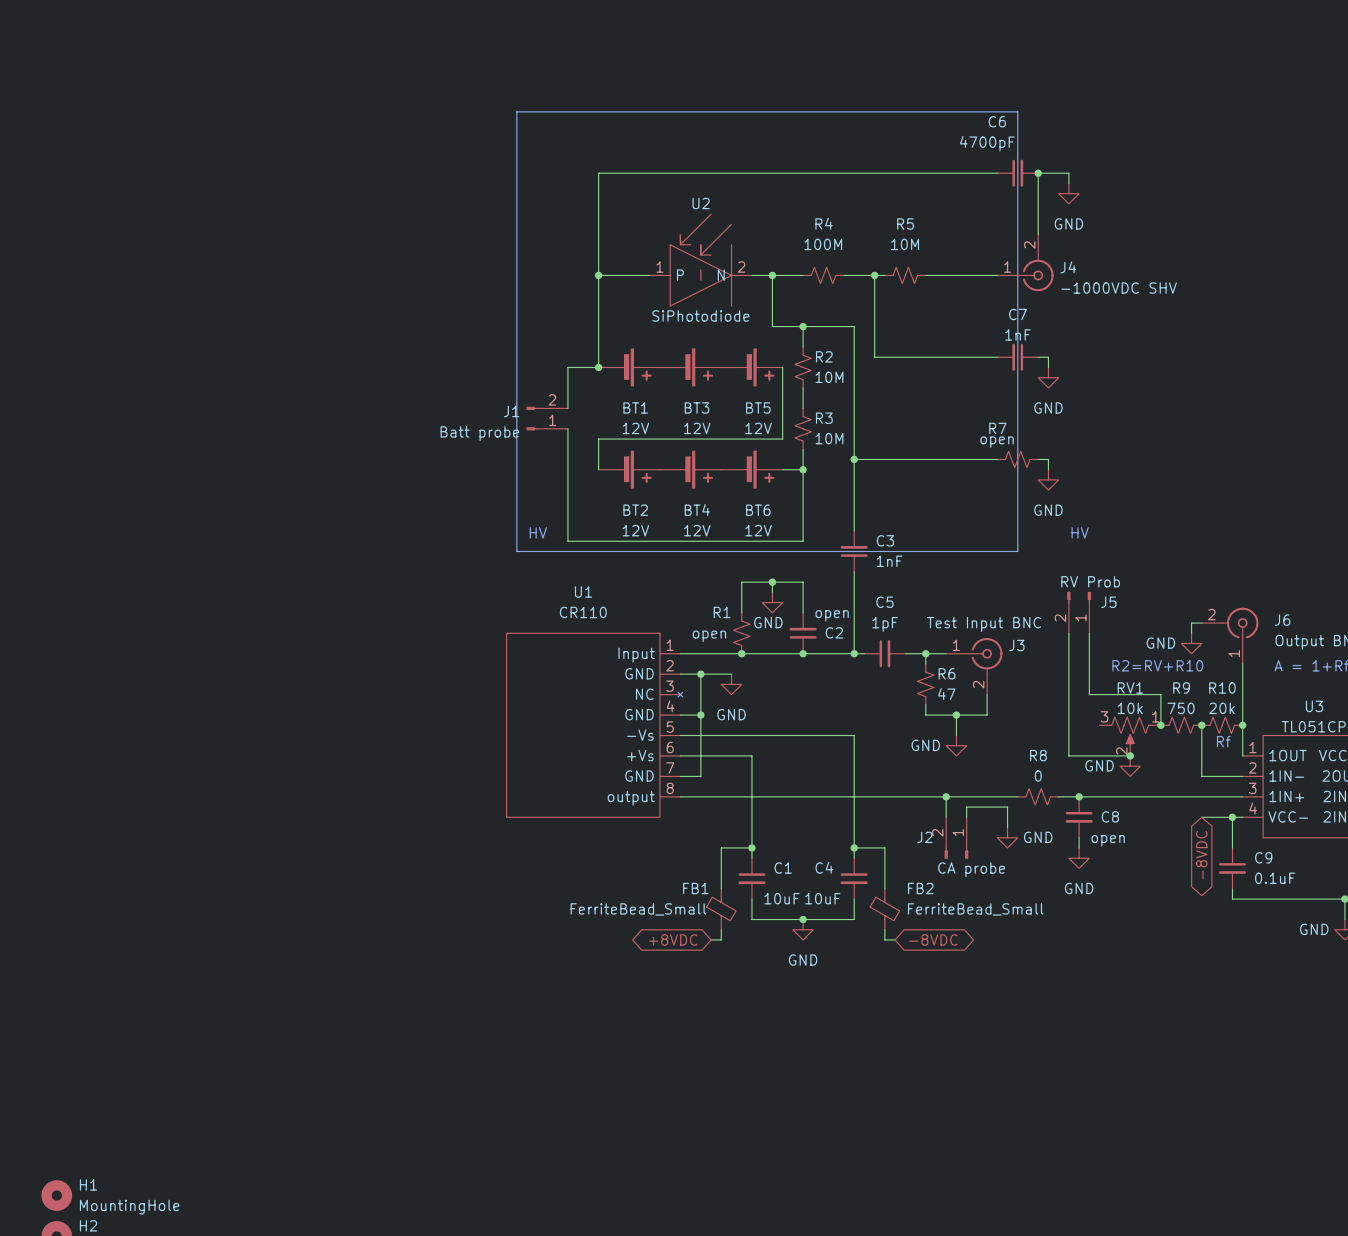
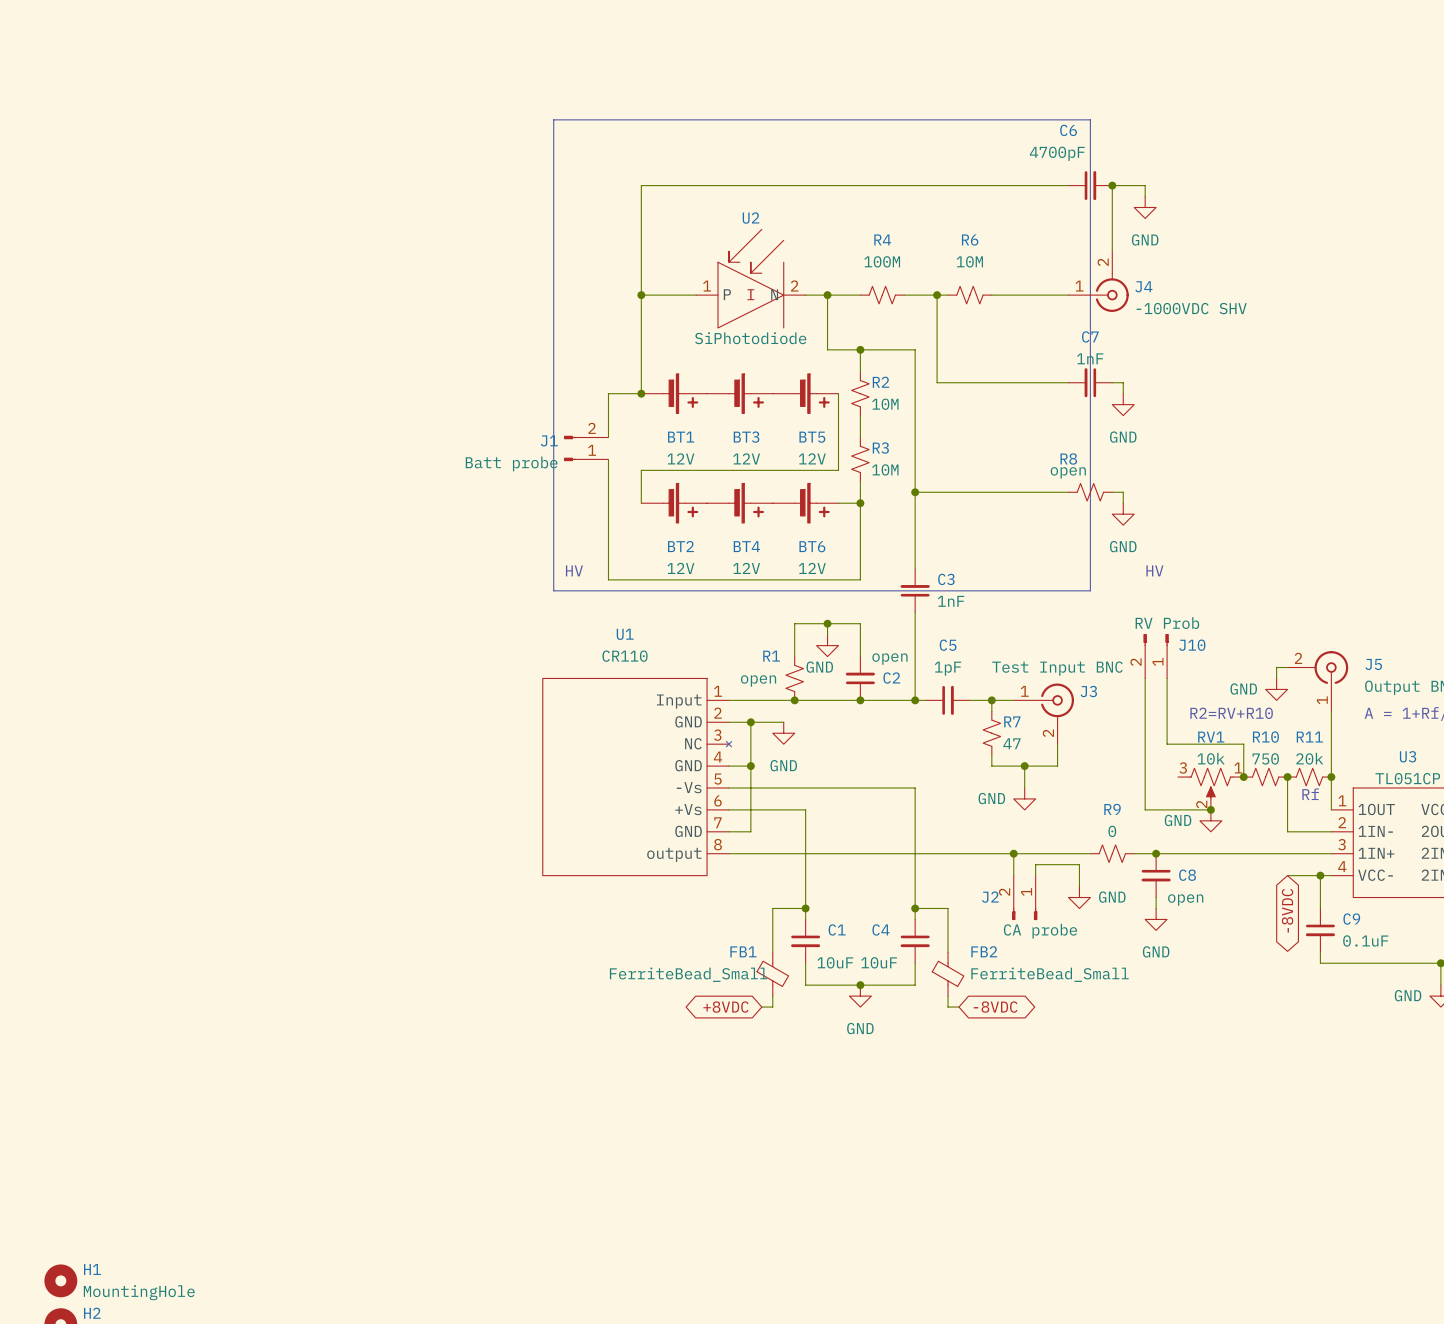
R5 name: R5 (905, 223) -> R6 (970, 240)
R7 name: R7 (997, 428) -> R8 (1068, 459)
J5 name: J5 (1108, 602) -> J10 (1192, 645)
J6 name: J6 (1282, 620) -> J5 (1373, 664)
R6 name: R6 (947, 673) -> R7 (1012, 721)
R9 name: R9 (1181, 687) -> R10 (1265, 737)
R10 name: R10 (1222, 687) -> R11 (1309, 737)
R8 name: R8 (1038, 755) -> R9 (1112, 809)

